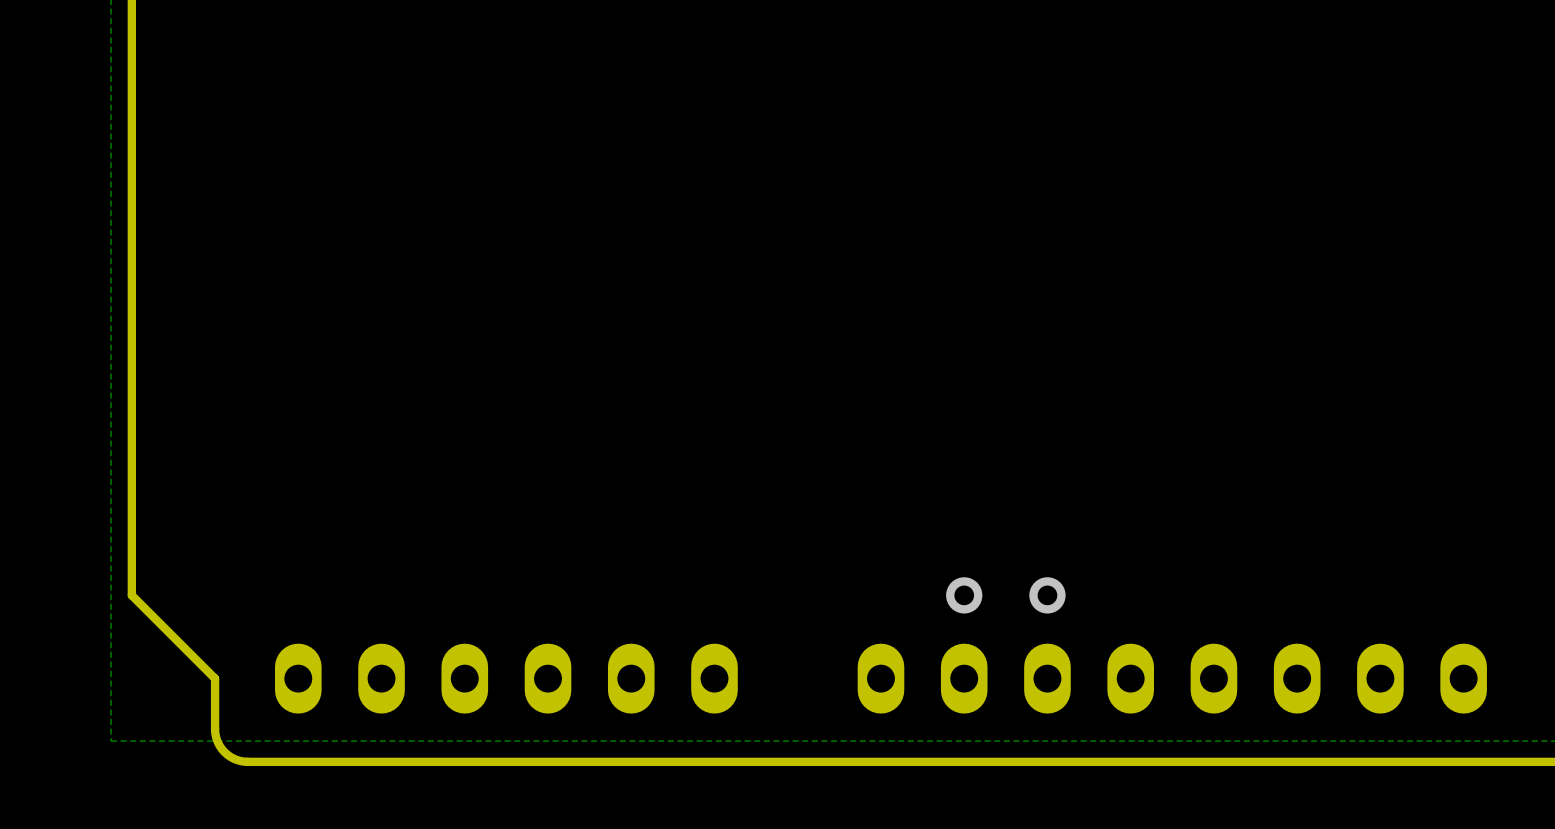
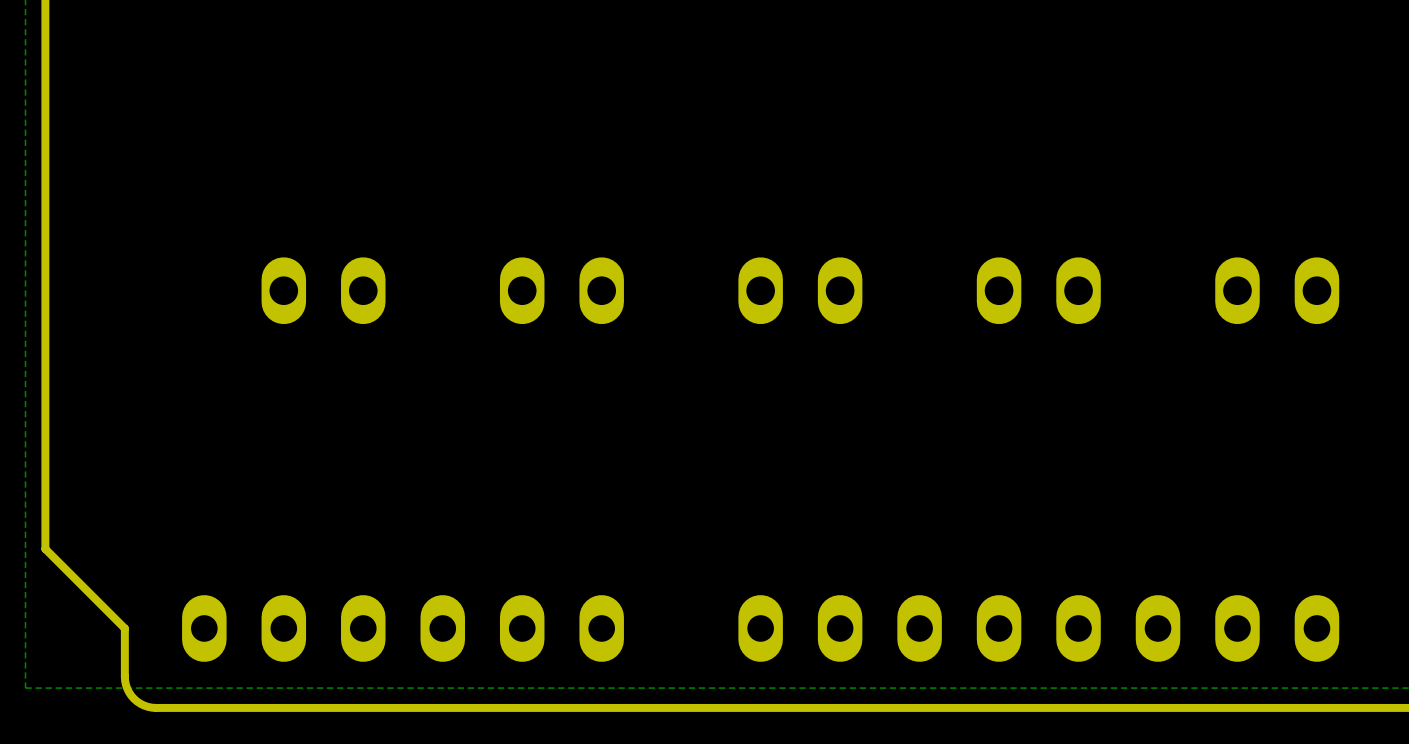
part: none -> (323, 290)
part: none -> (561, 290)
part: none -> (800, 290)
part: none -> (1038, 290)
part: none -> (1277, 290)
via: (964, 595) -> none
via: (1047, 595) -> none

